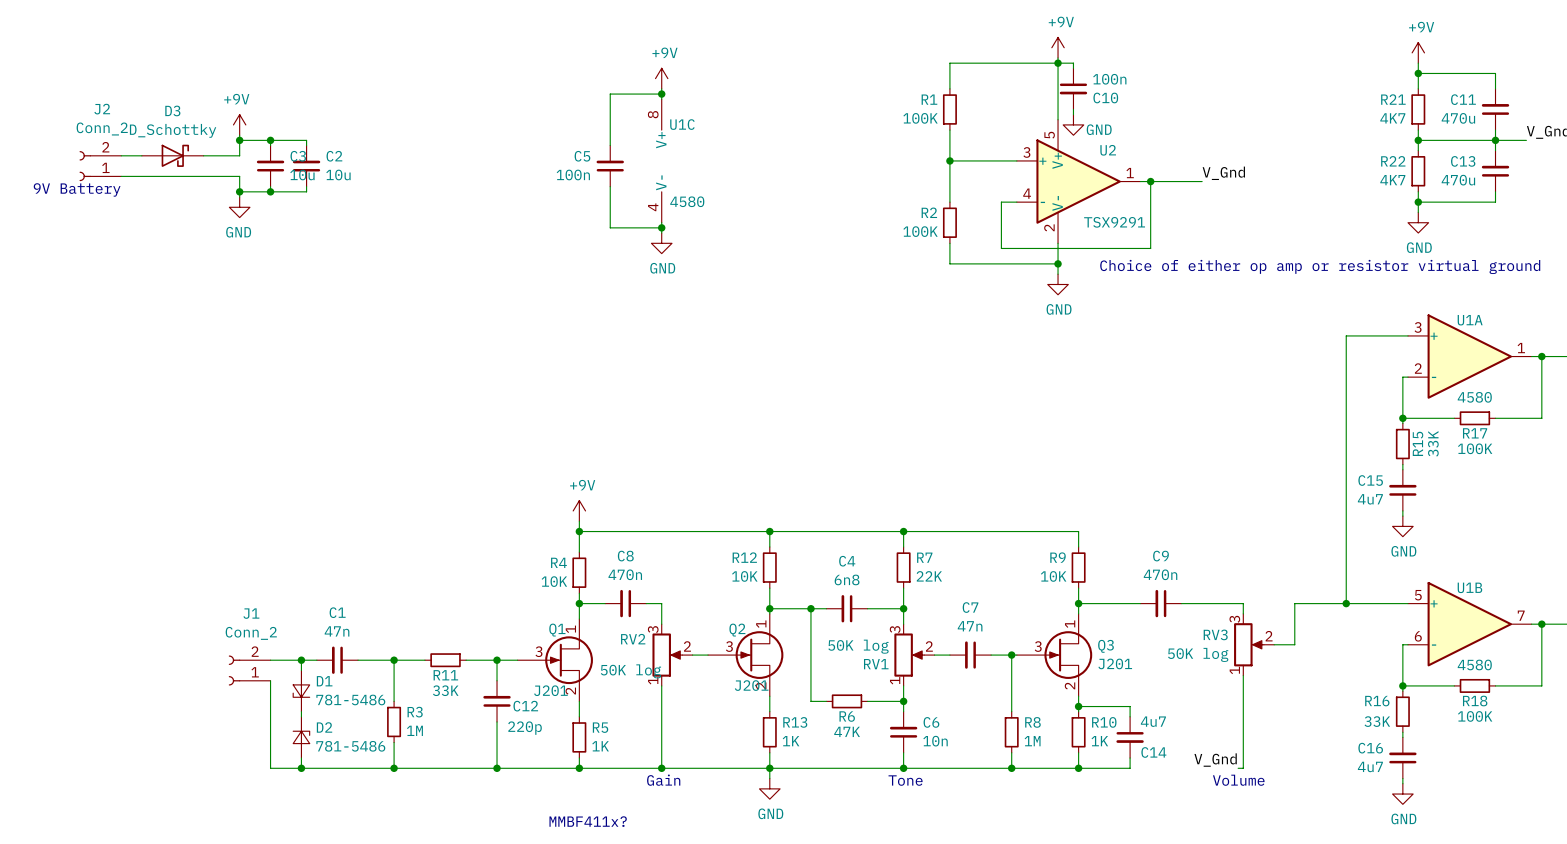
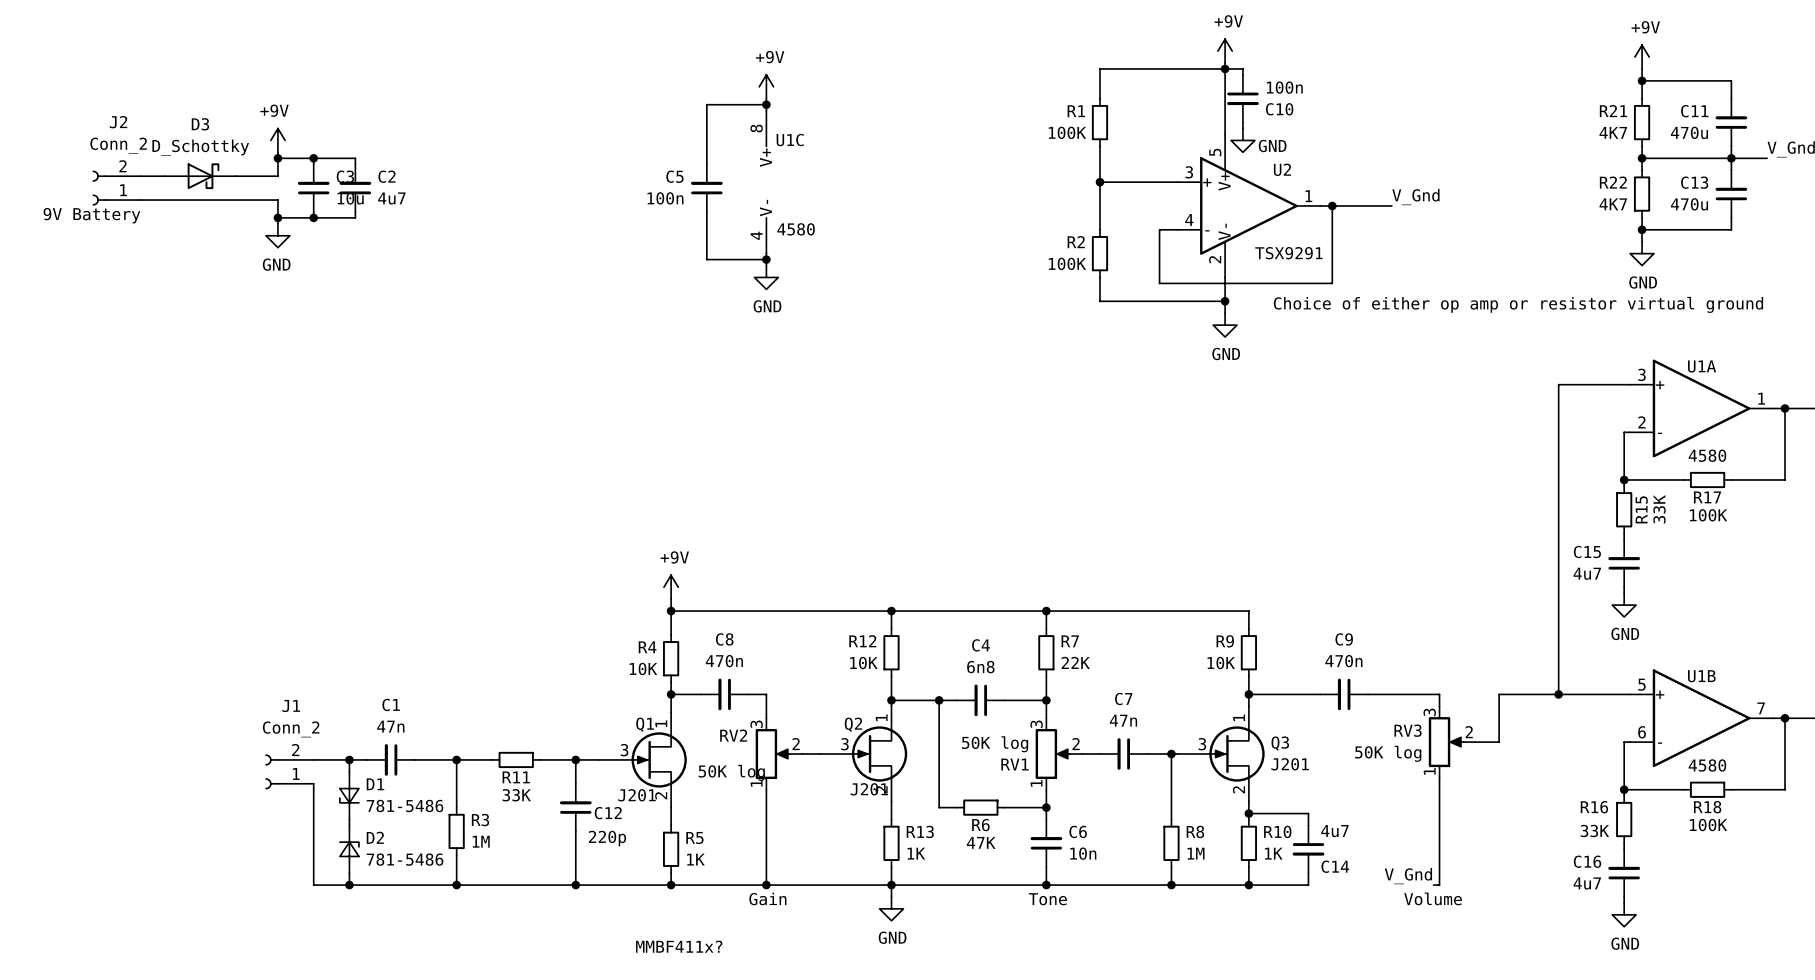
C2 value: 10u (338, 174) -> 4u7 (391, 198)

